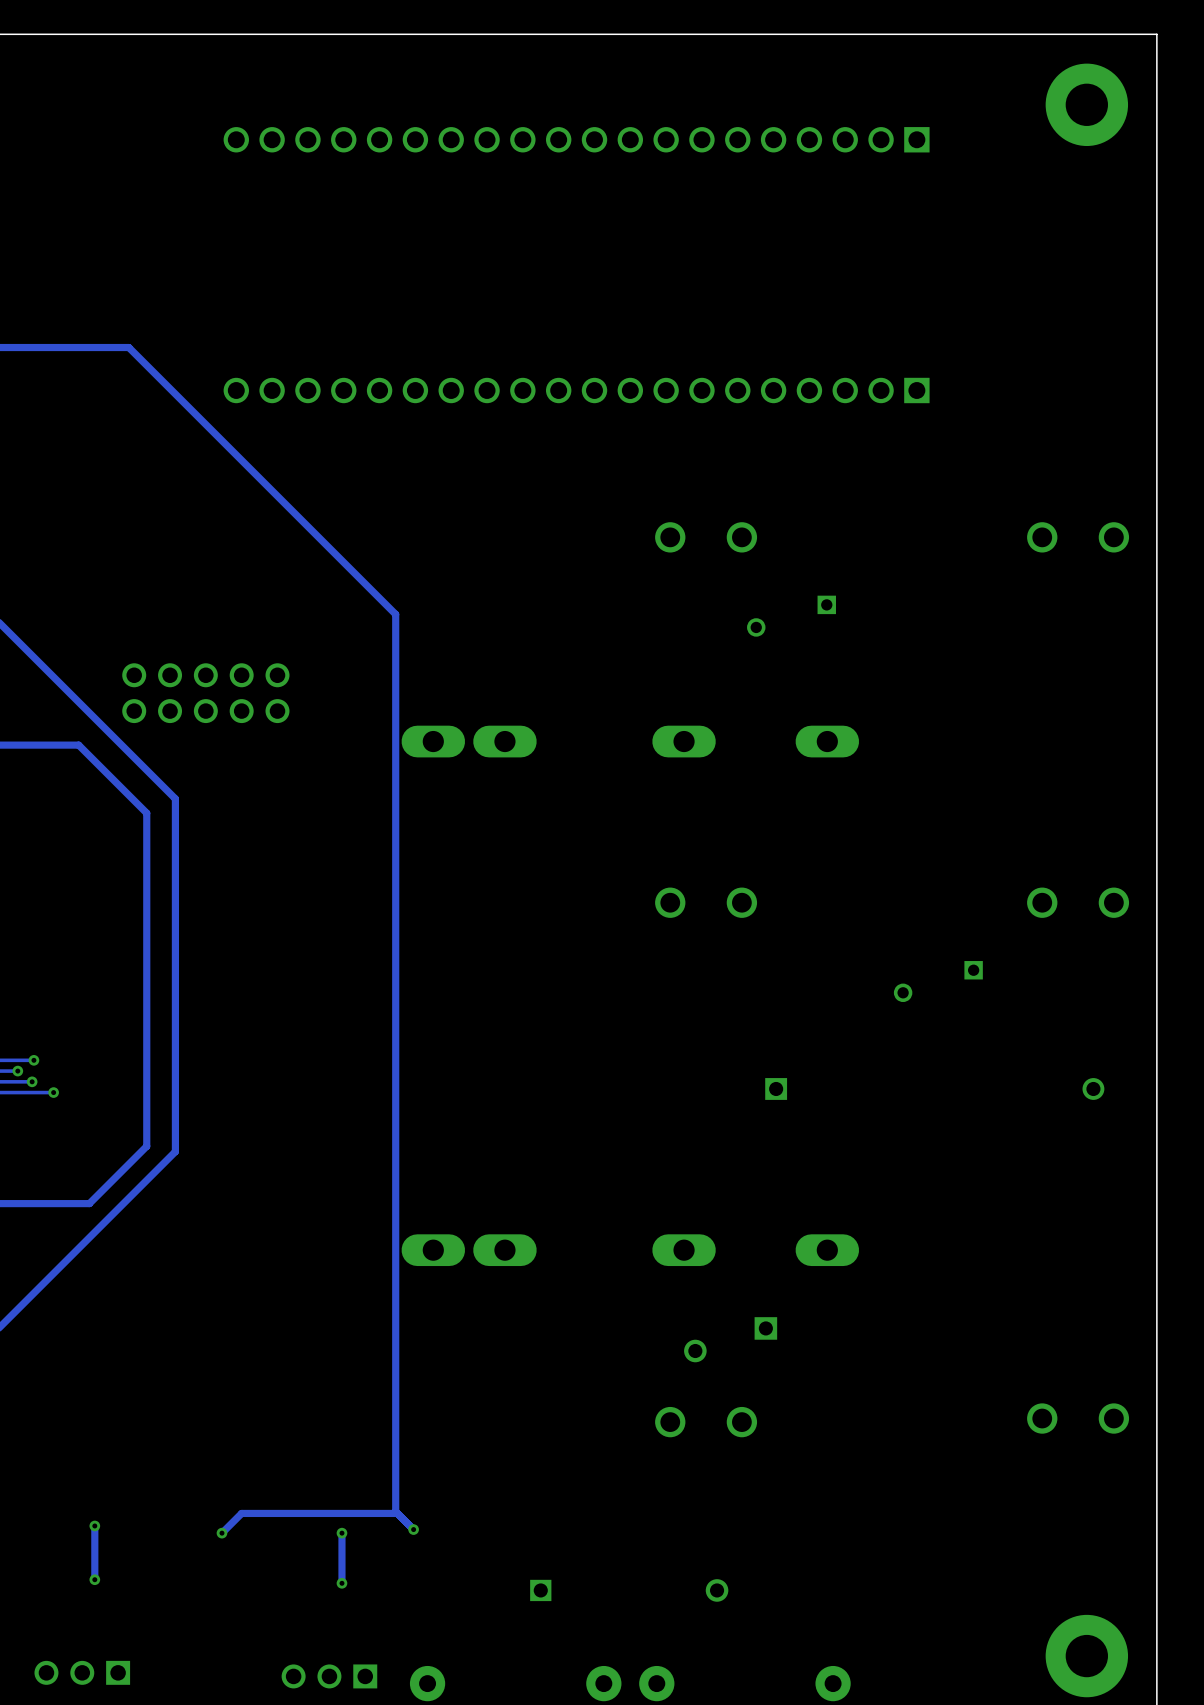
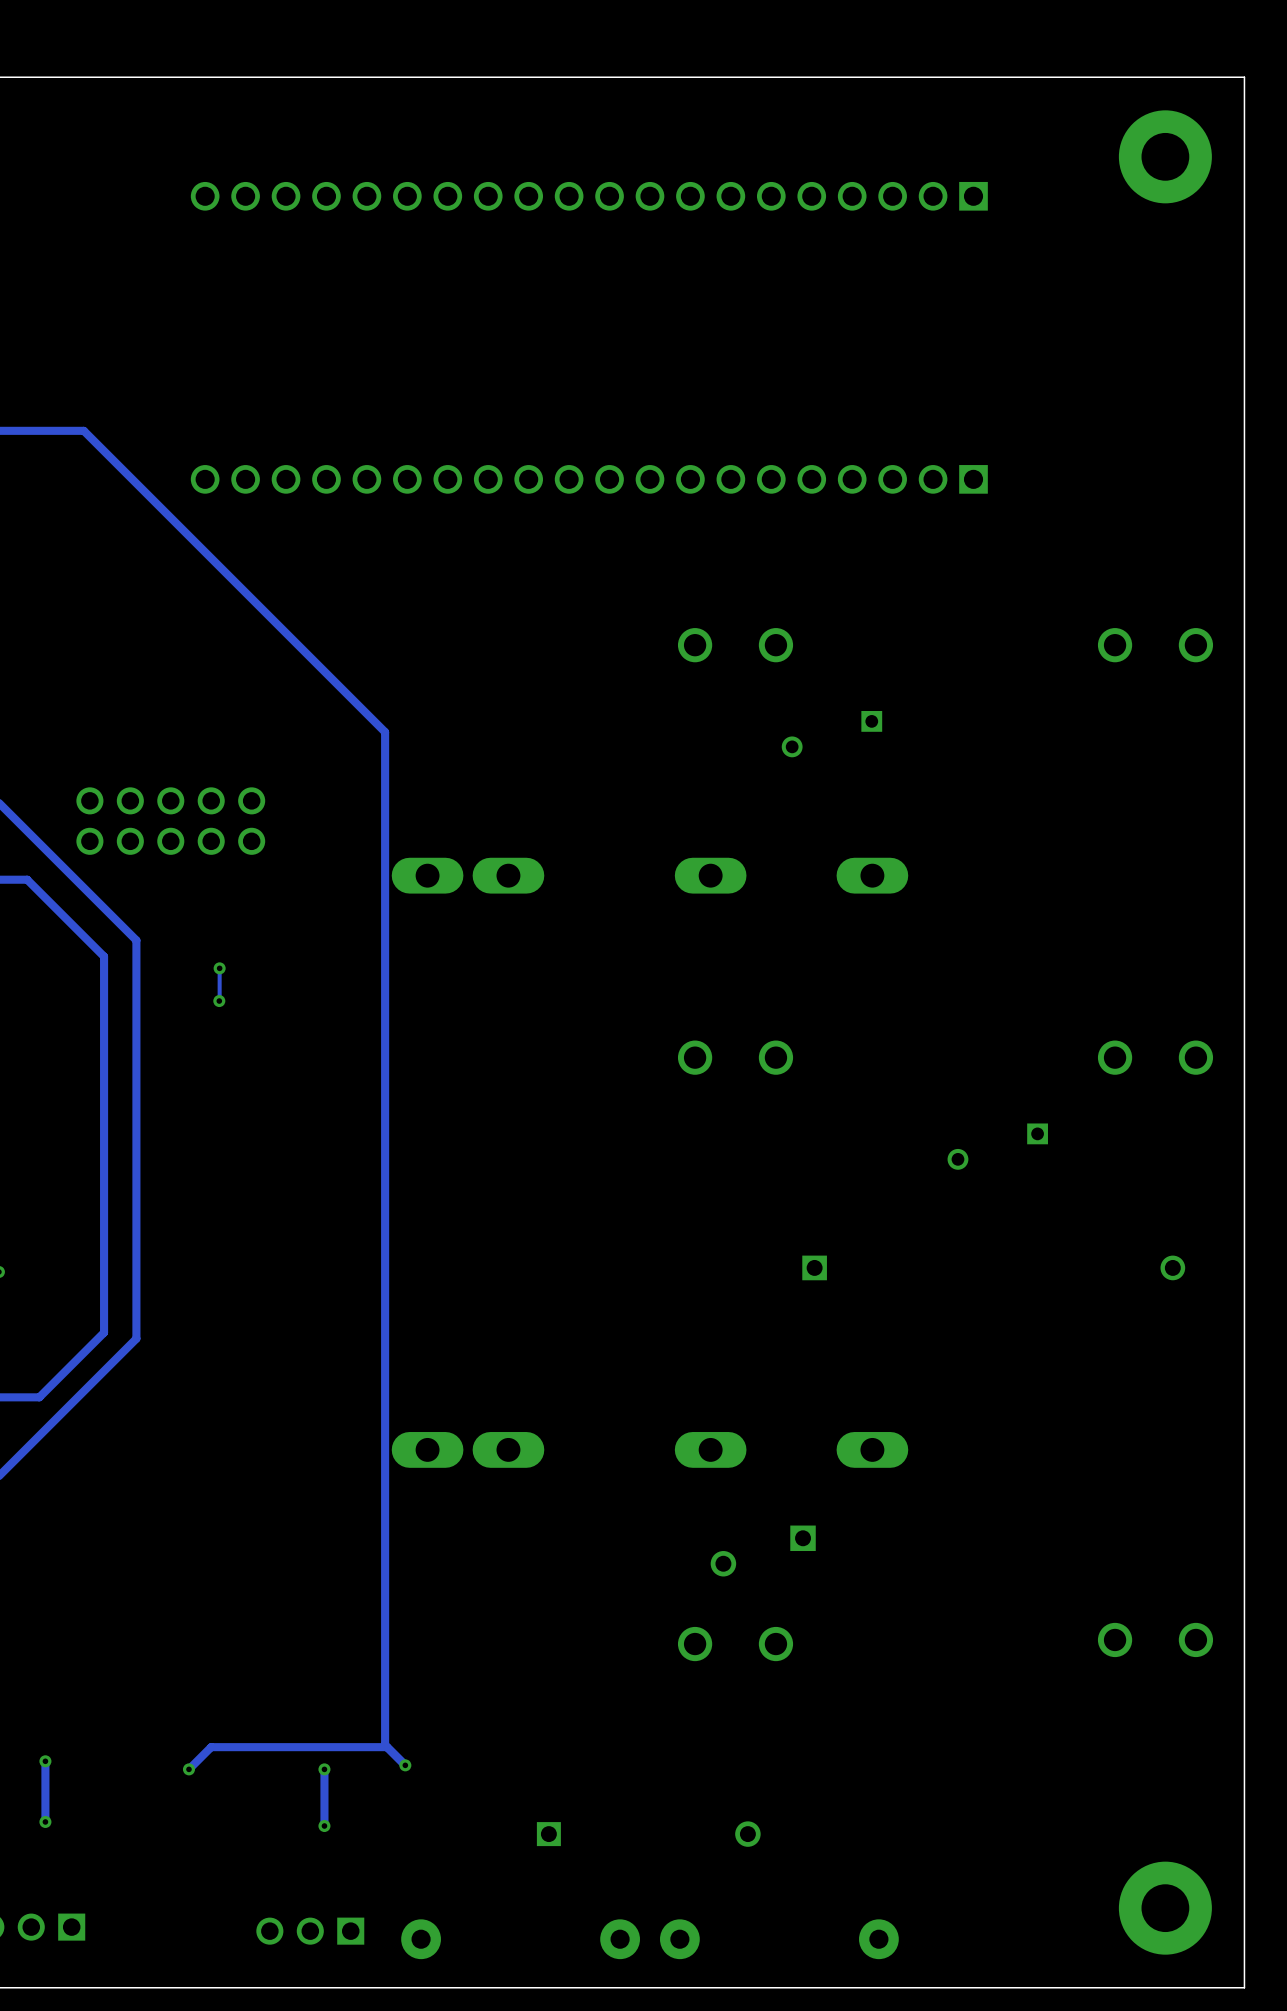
track: none -> (219, 968) (219, 1001)
via: none -> (219, 968)
via: none -> (219, 1001)

